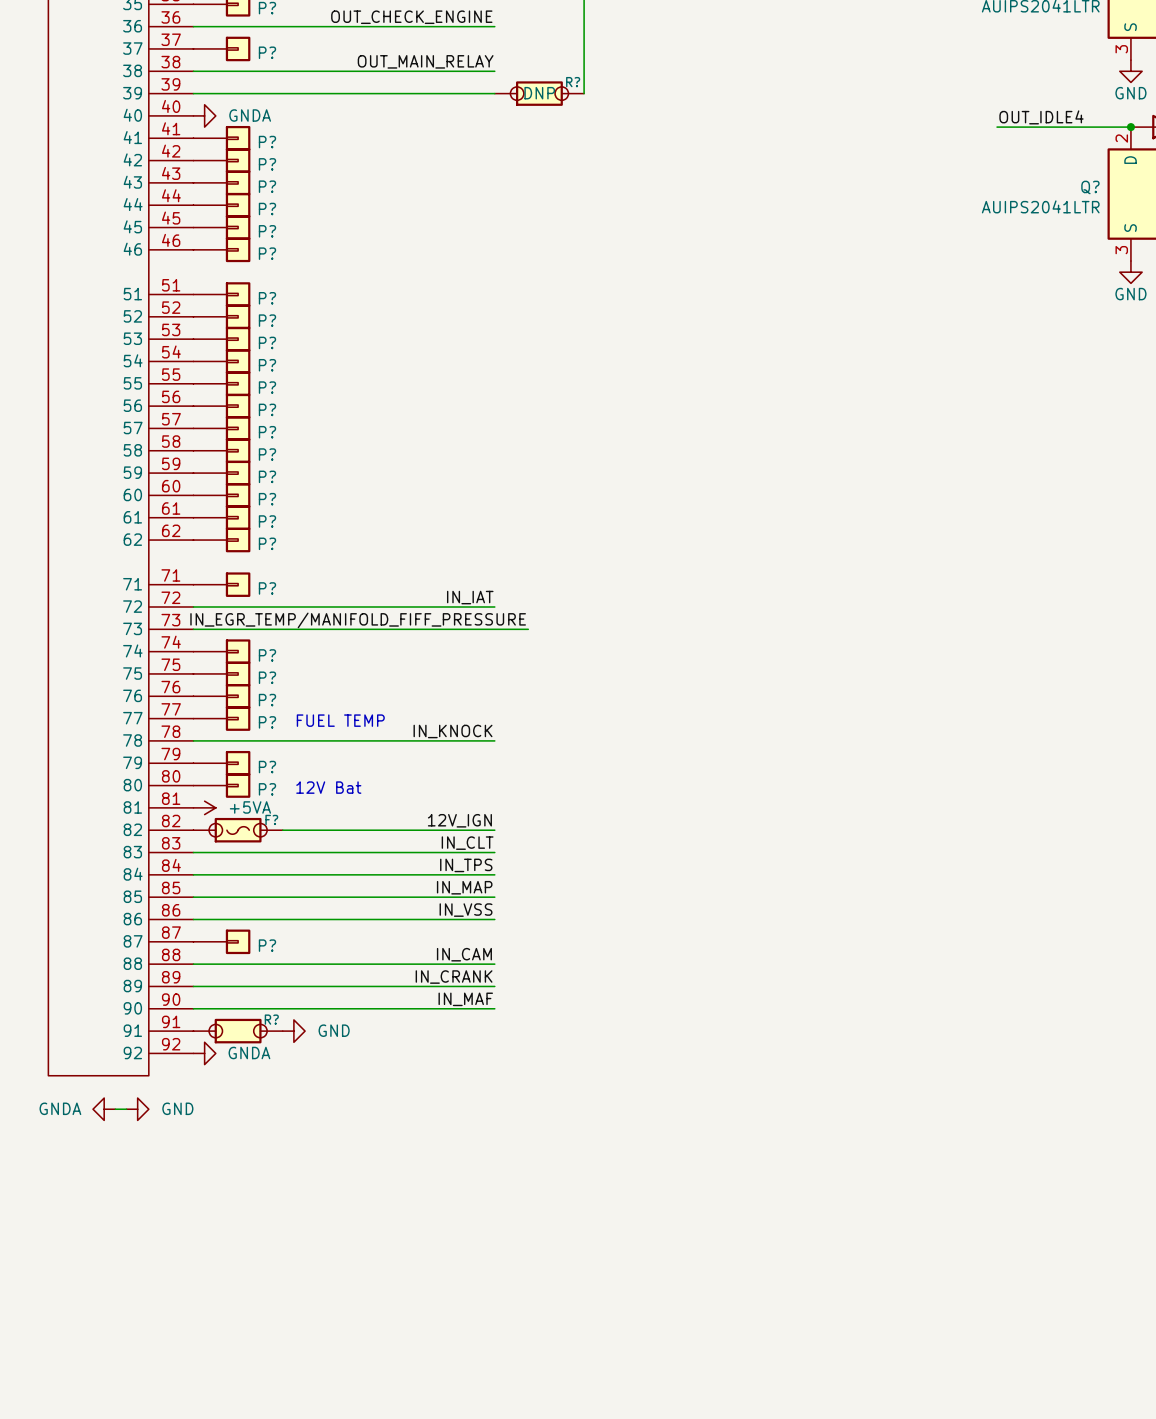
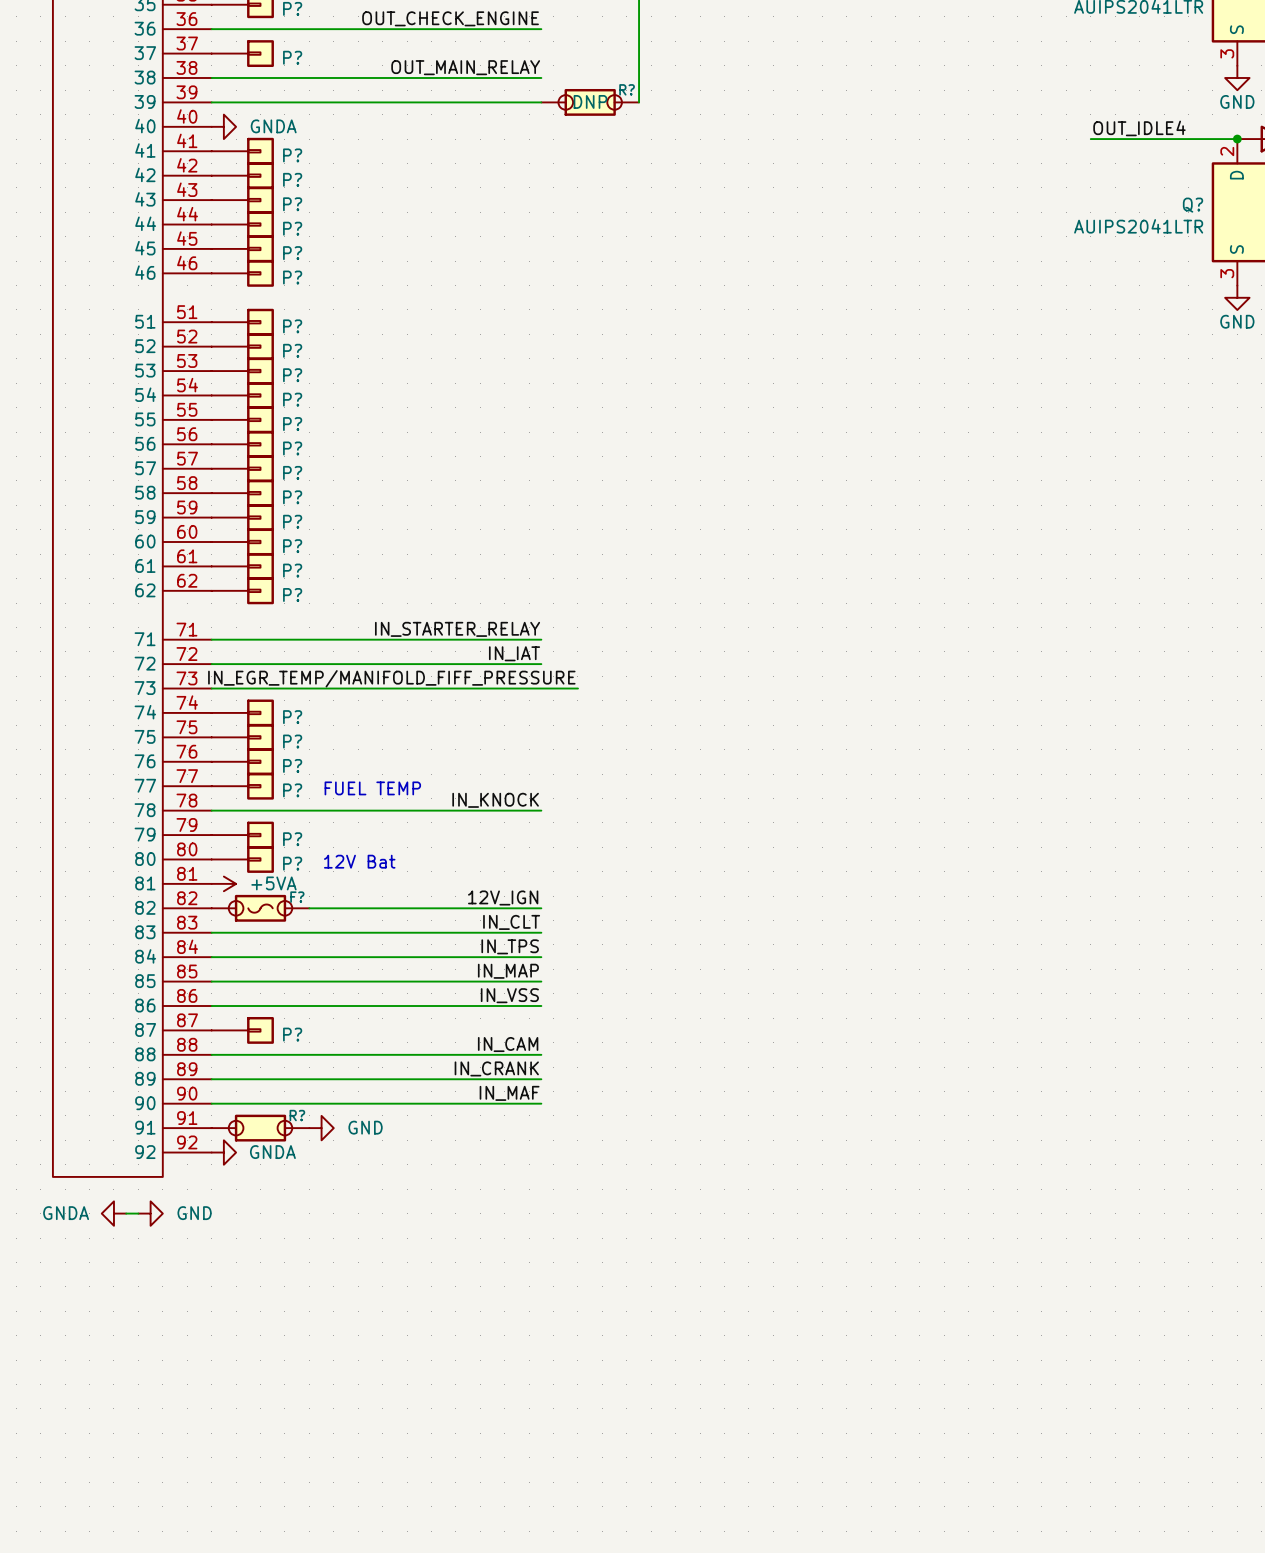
label: none -> IN_STARTER_RELAY (457, 629)
wire: none -> (211, 639) (541, 639)
P?: (221, 584) -> none

